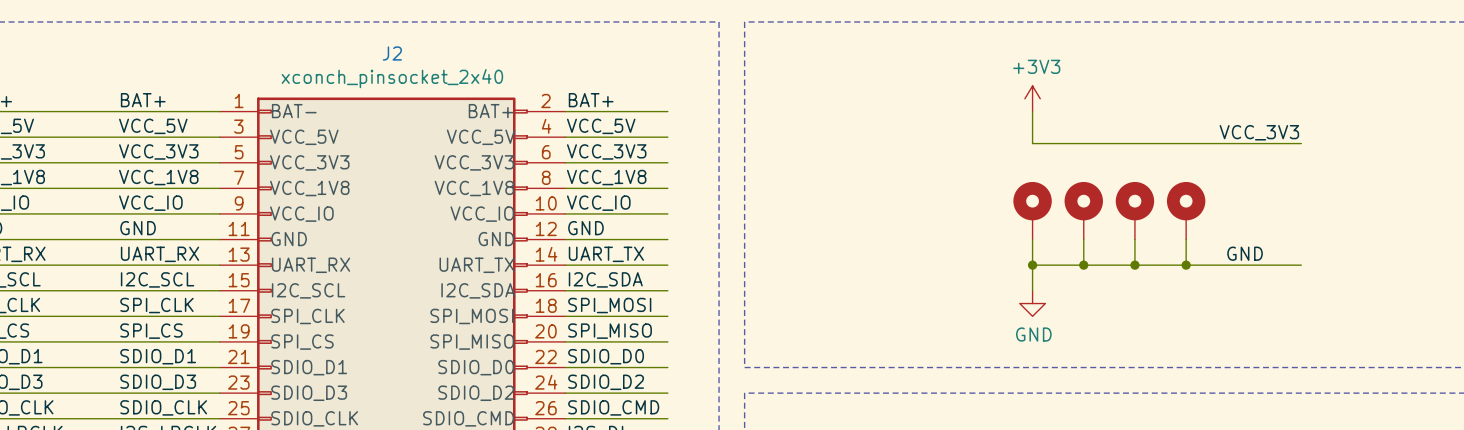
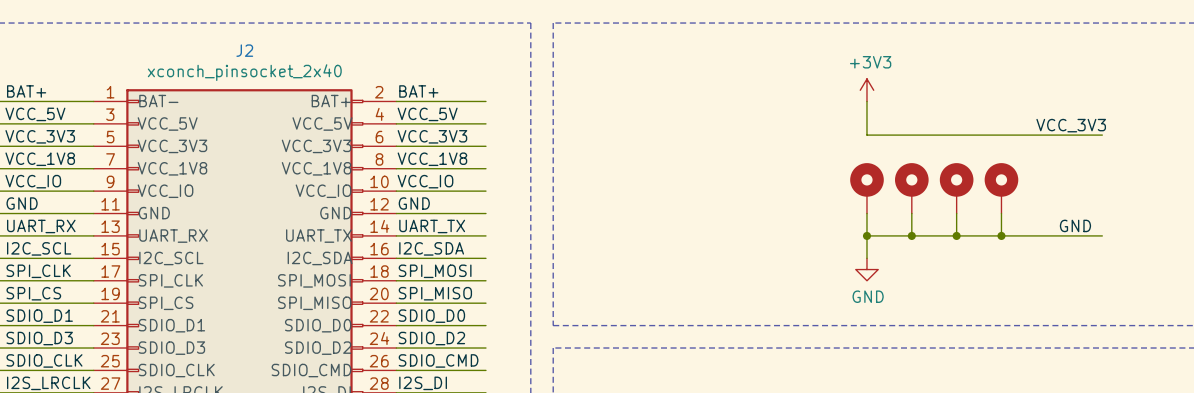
power symbol position: +3V3 (1032, 98) -> +3V3 (866, 90)
wire: (1032, 111) (1032, 143) (1301, 143) -> none
wire: none -> (866, 101) (866, 135) (1102, 135)
label position: VCC_3V3 (1259, 132) -> VCC_3V3 (1071, 125)
part: (1032, 210) -> none
part: (1083, 210) -> none
part: none -> (866, 188)
part: (1134, 210) -> none
part: none -> (911, 188)
part: (1186, 210) -> none
part: none -> (956, 188)
part: none -> (1001, 188)
wire: (1032, 239) (1032, 290) -> (866, 213) (866, 258)
wire: (1083, 239) (1083, 265) -> (911, 213) (911, 235)
wire: (1134, 239) (1134, 265) -> (956, 213) (956, 235)
wire: (1186, 239) (1186, 265) -> (1001, 213) (1001, 235)
label position: GND (1245, 253) -> GND (1075, 225)
wire: (1032, 265) (1102, 265) -> none
junction: (1032, 265) -> none
junction: (1083, 265) -> none
junction: none -> (866, 235)
junction: (1134, 265) -> none
junction: none -> (911, 235)
junction: (1186, 265) -> none
junction: none -> (956, 235)
junction: none -> (1001, 235)
wire: none -> (1040, 235) (1102, 235)
power symbol position: GND (1032, 303) -> GND (866, 269)

